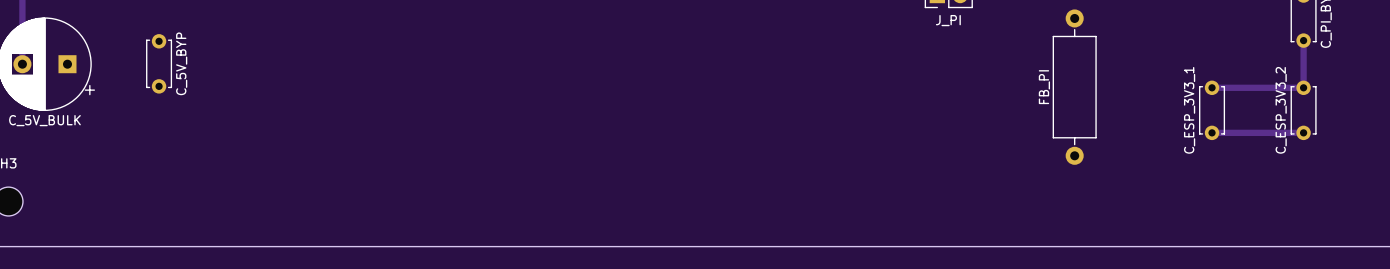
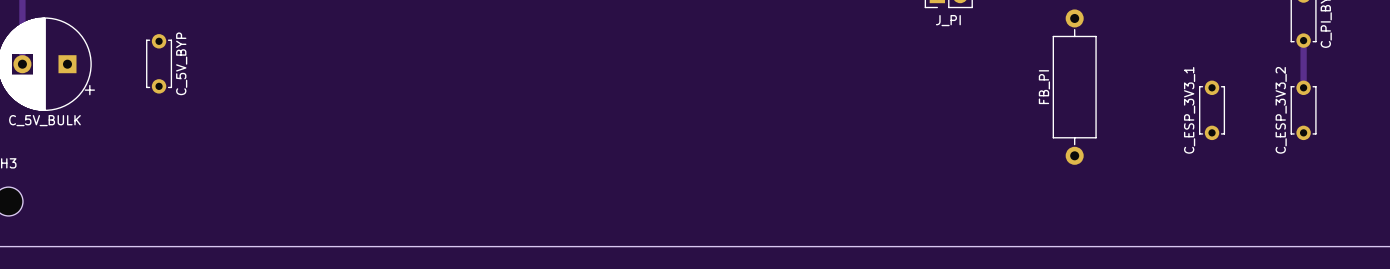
track: (1212, 87) (1303, 87) -> none
track: (1212, 132) (1303, 132) -> none

